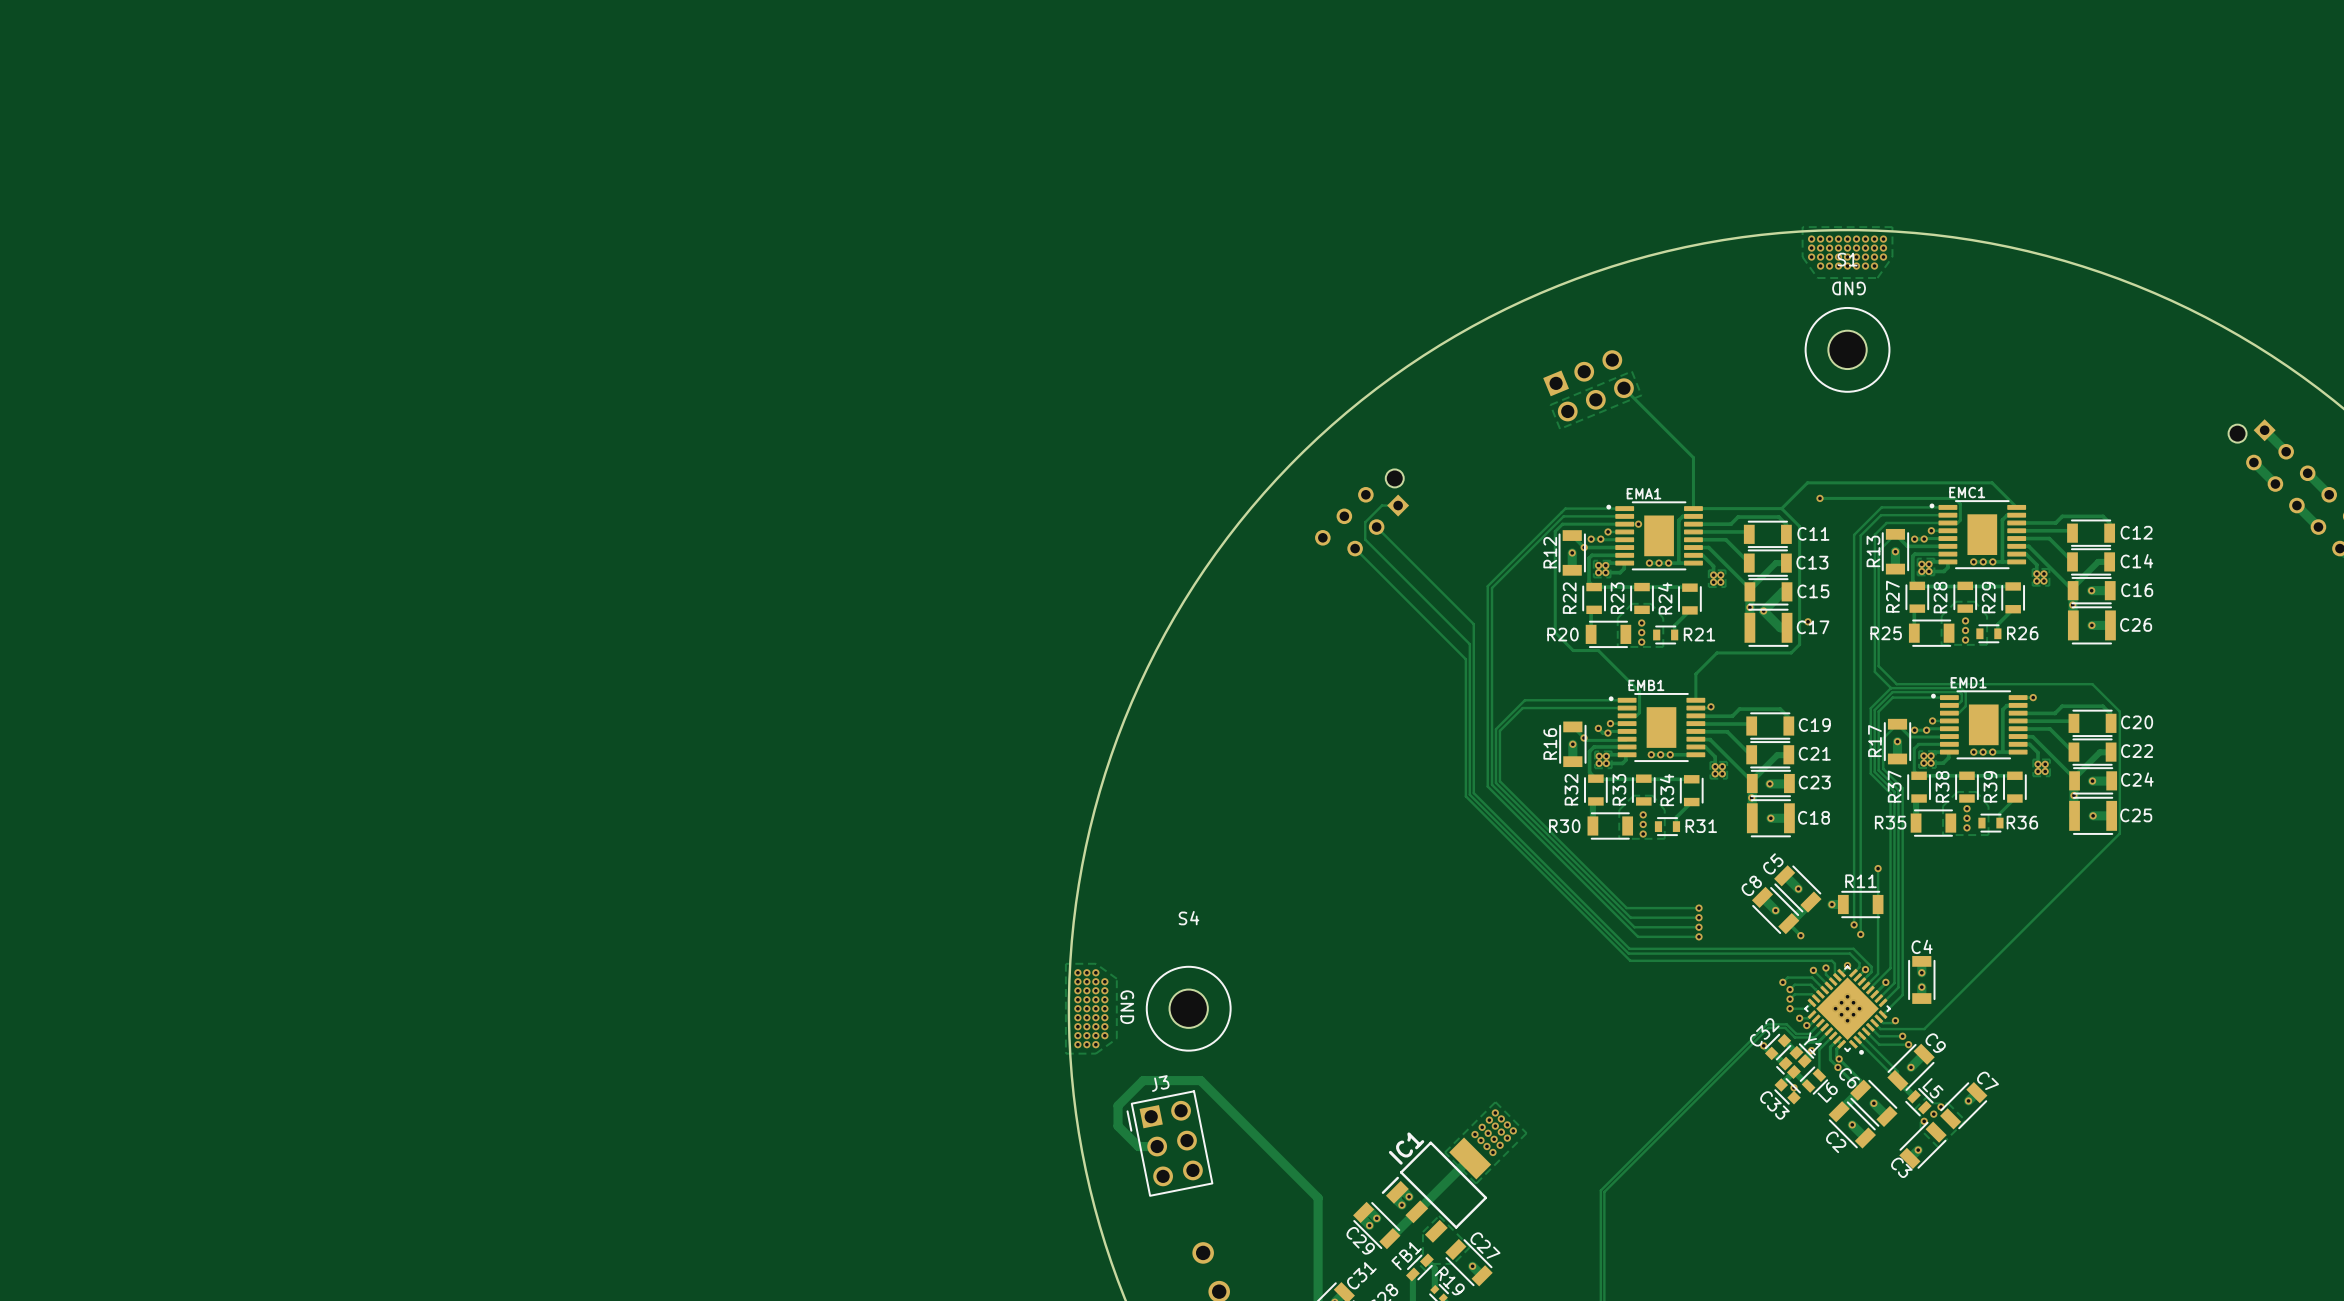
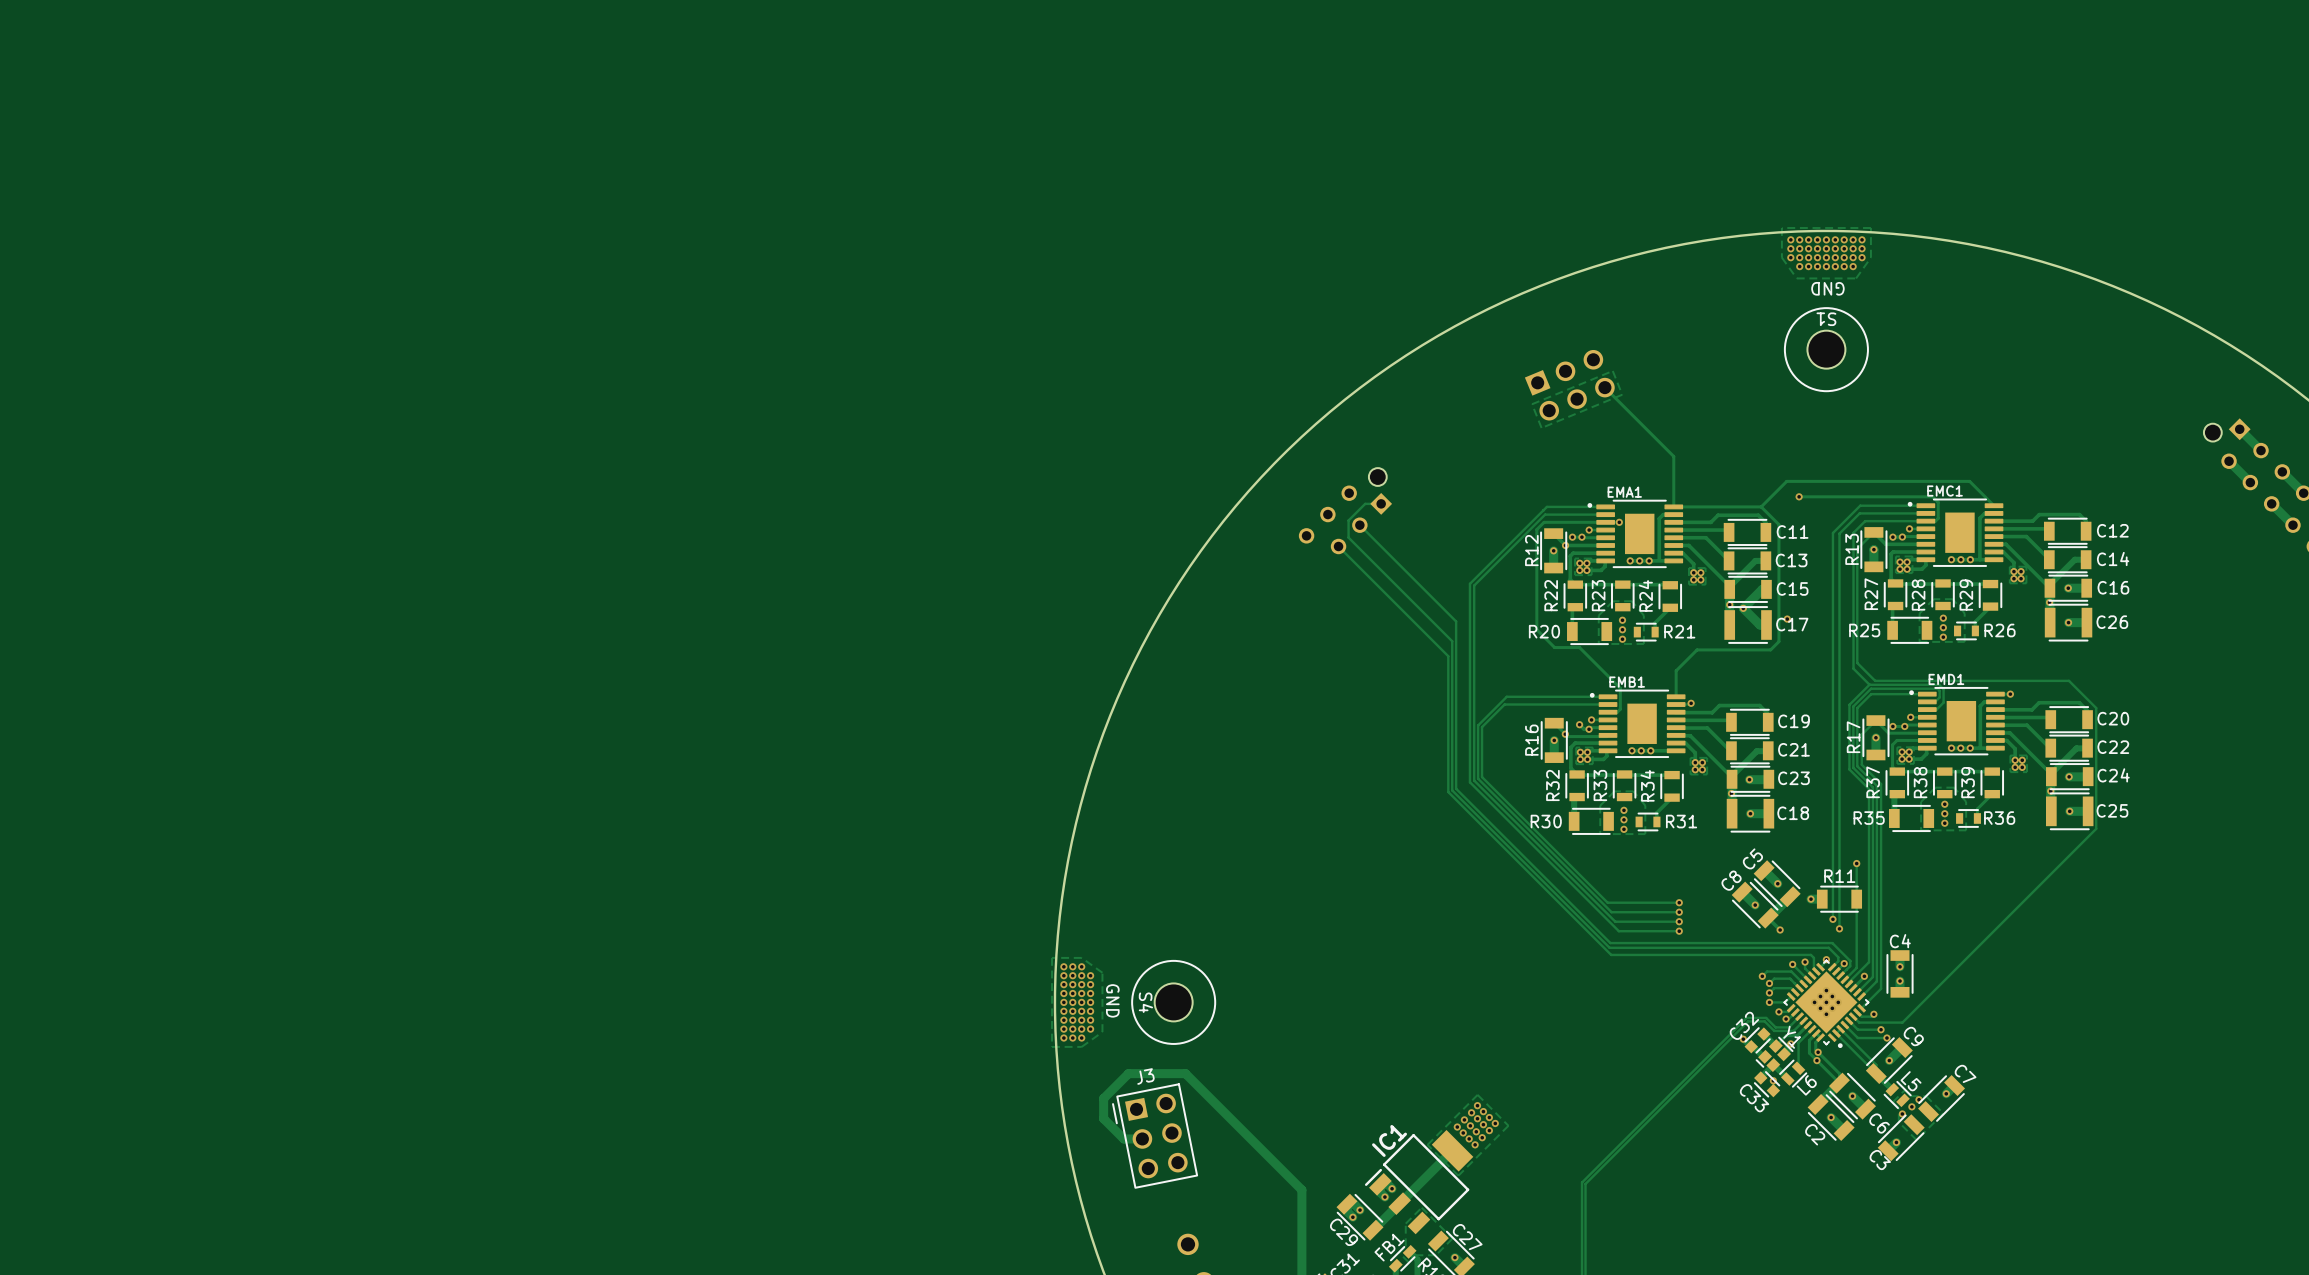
S1 name rotation: 0° (1847, 259) -> 180° (1826, 319)
S1 name position: S1 (1847, 259) -> S1 (1826, 319)
S4 name rotation: 0° (1188, 918) -> 90° clockwise (1145, 1002)
S4 name position: S4 (1188, 918) -> S4 (1145, 1002)
C6 name position: C6 (1849, 1078) -> C6 (1879, 1123)

